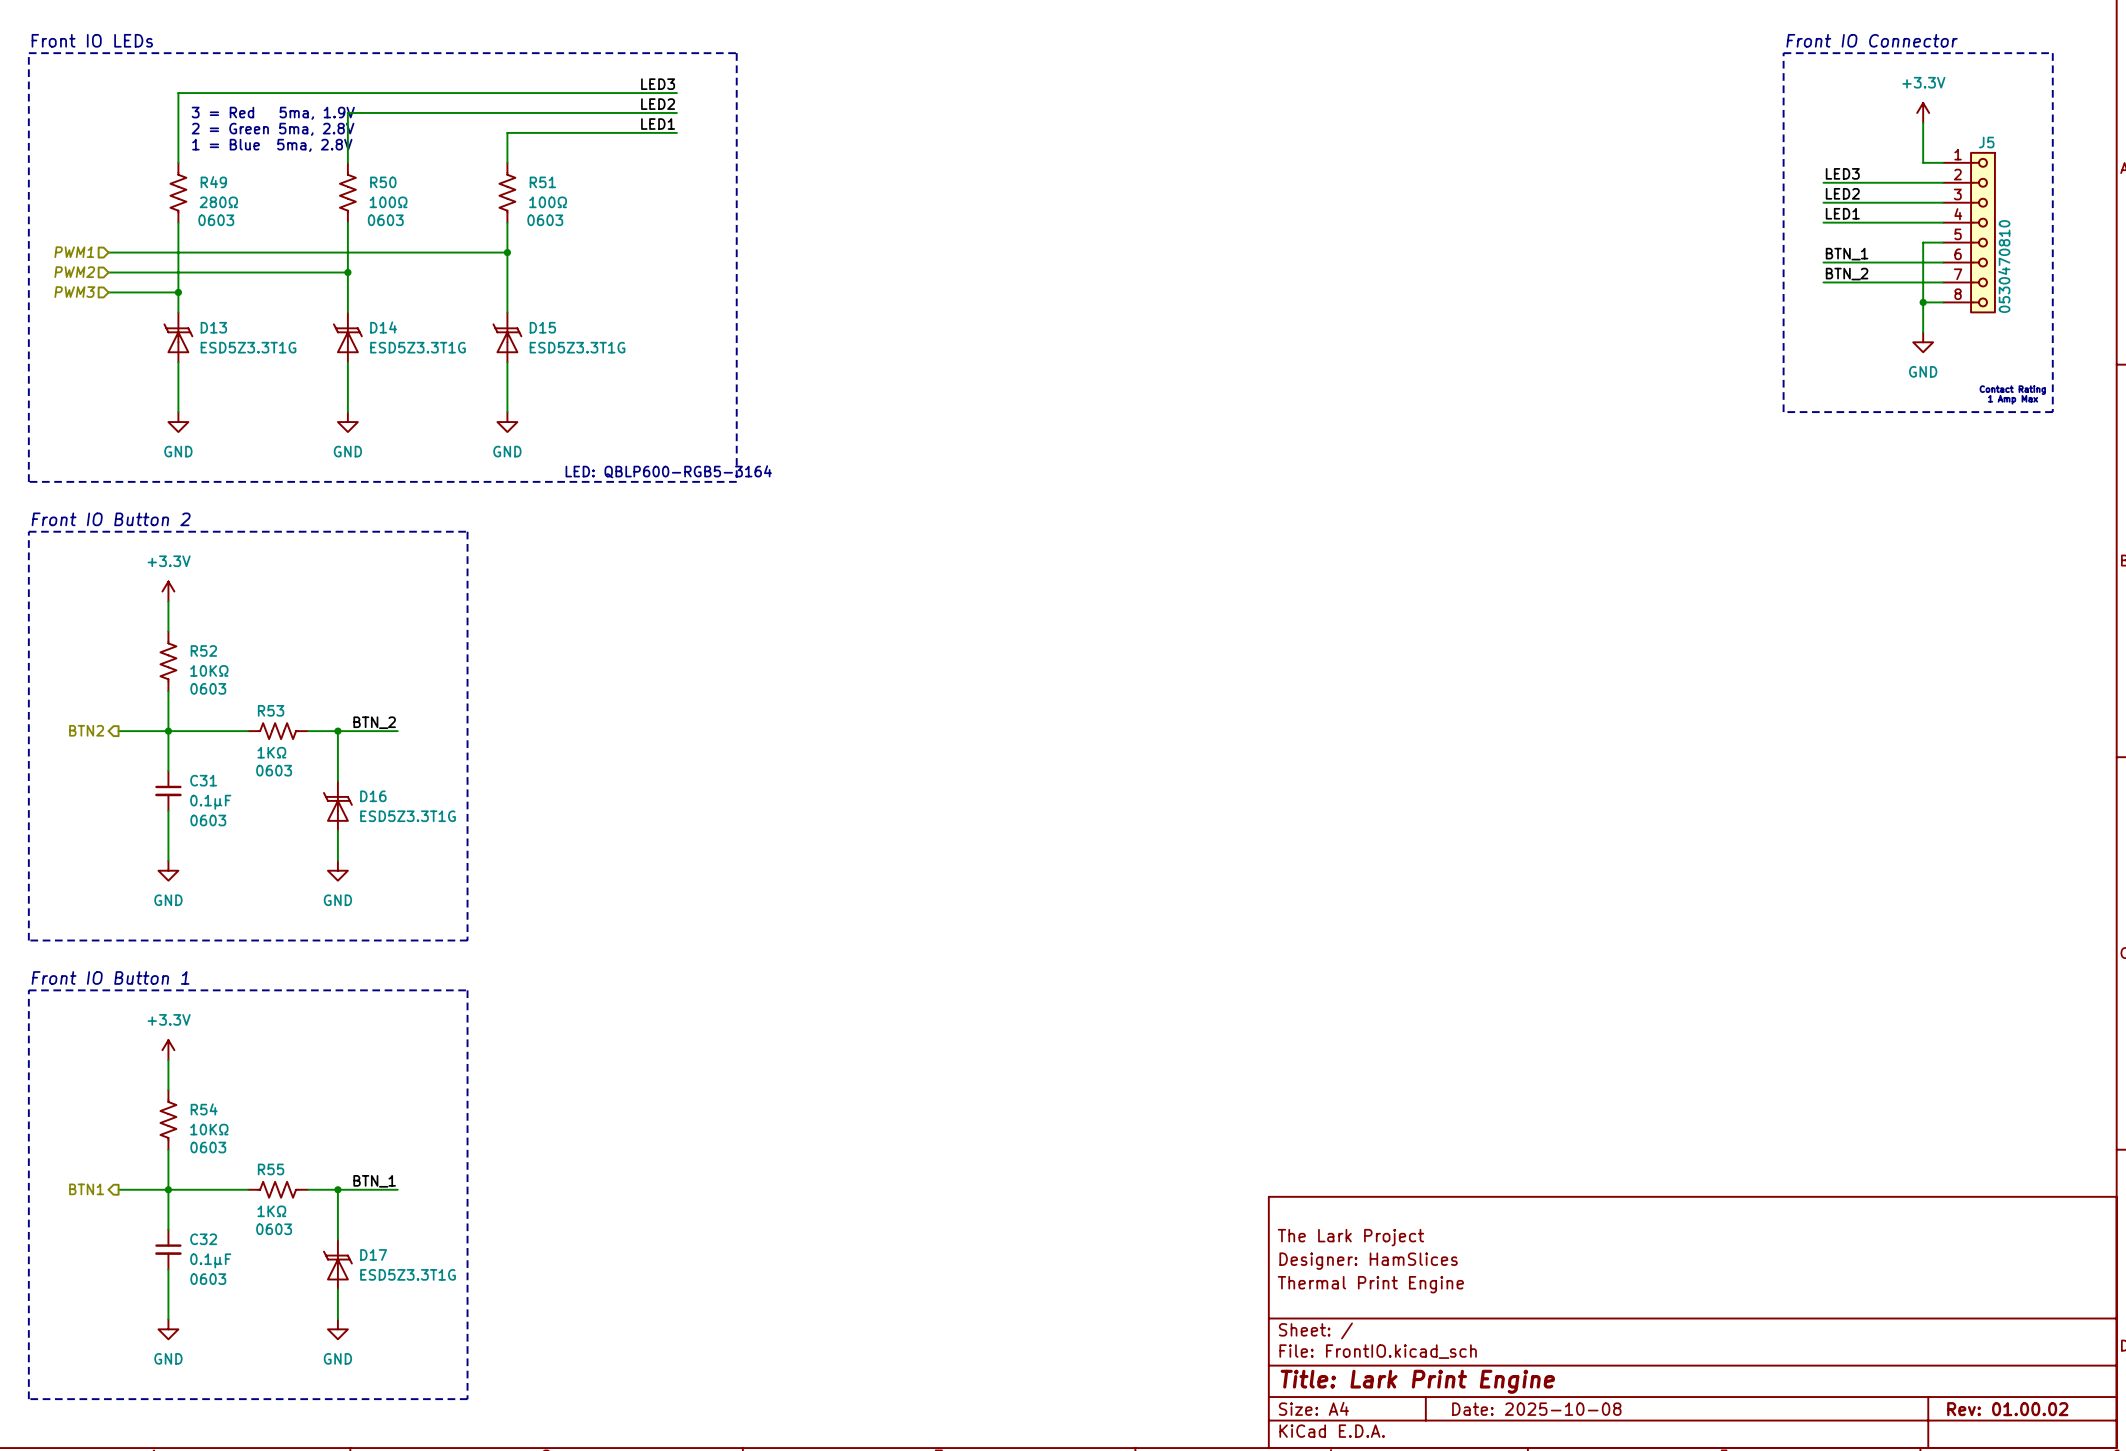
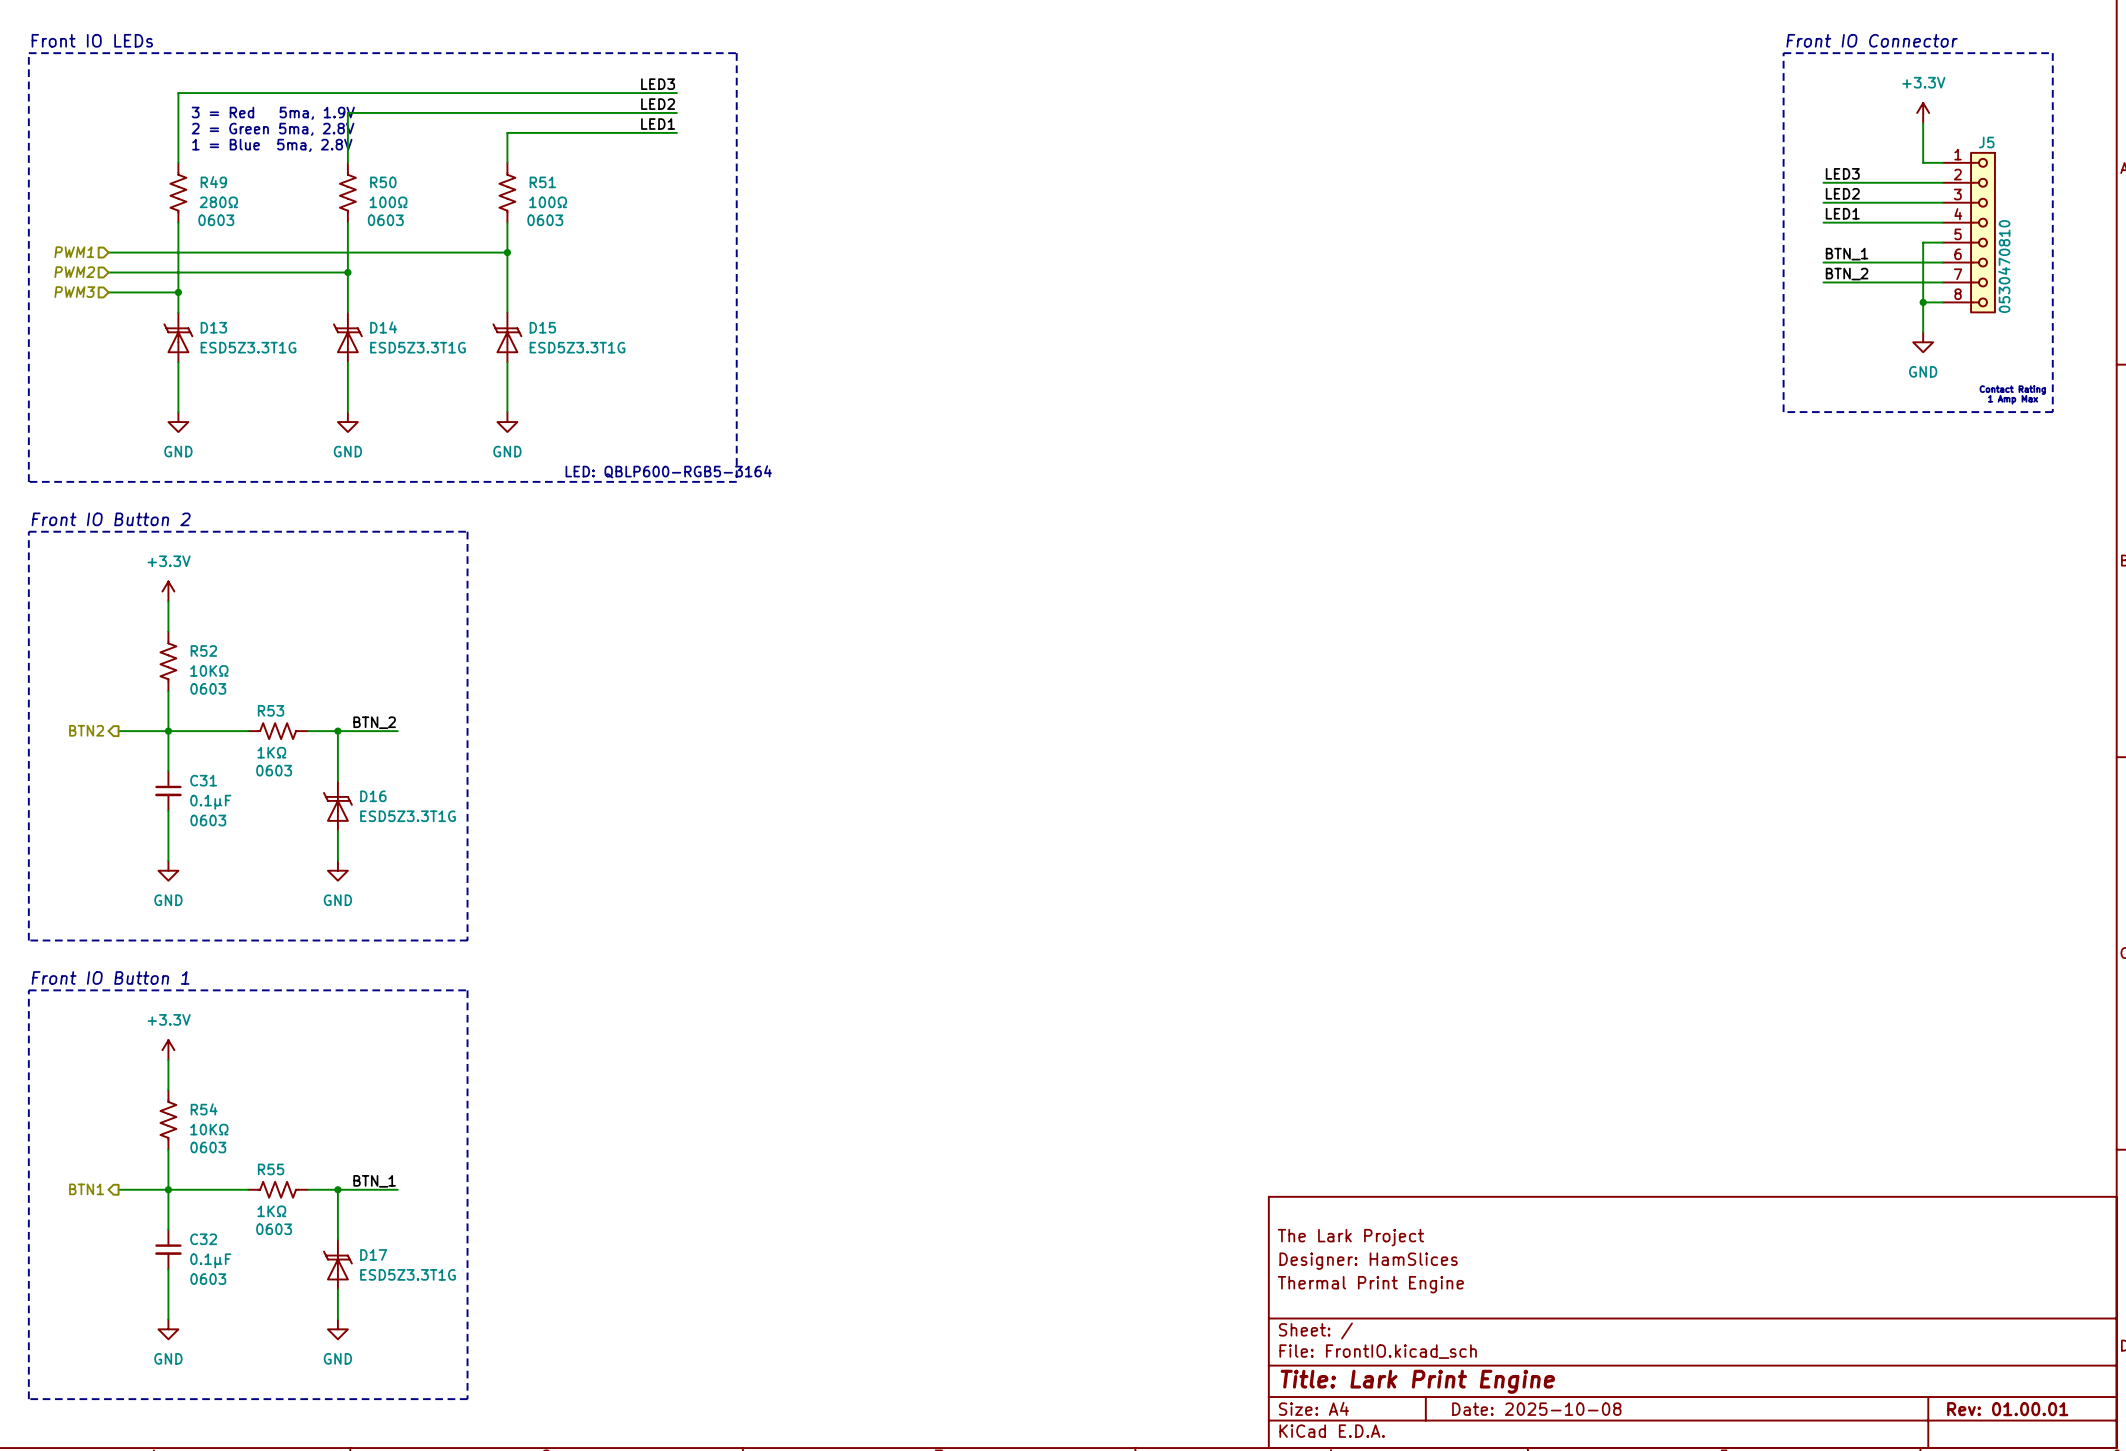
title block: Rev: 01.00.02 (2007, 1409) -> Rev: 01.00.01 (2007, 1409)

